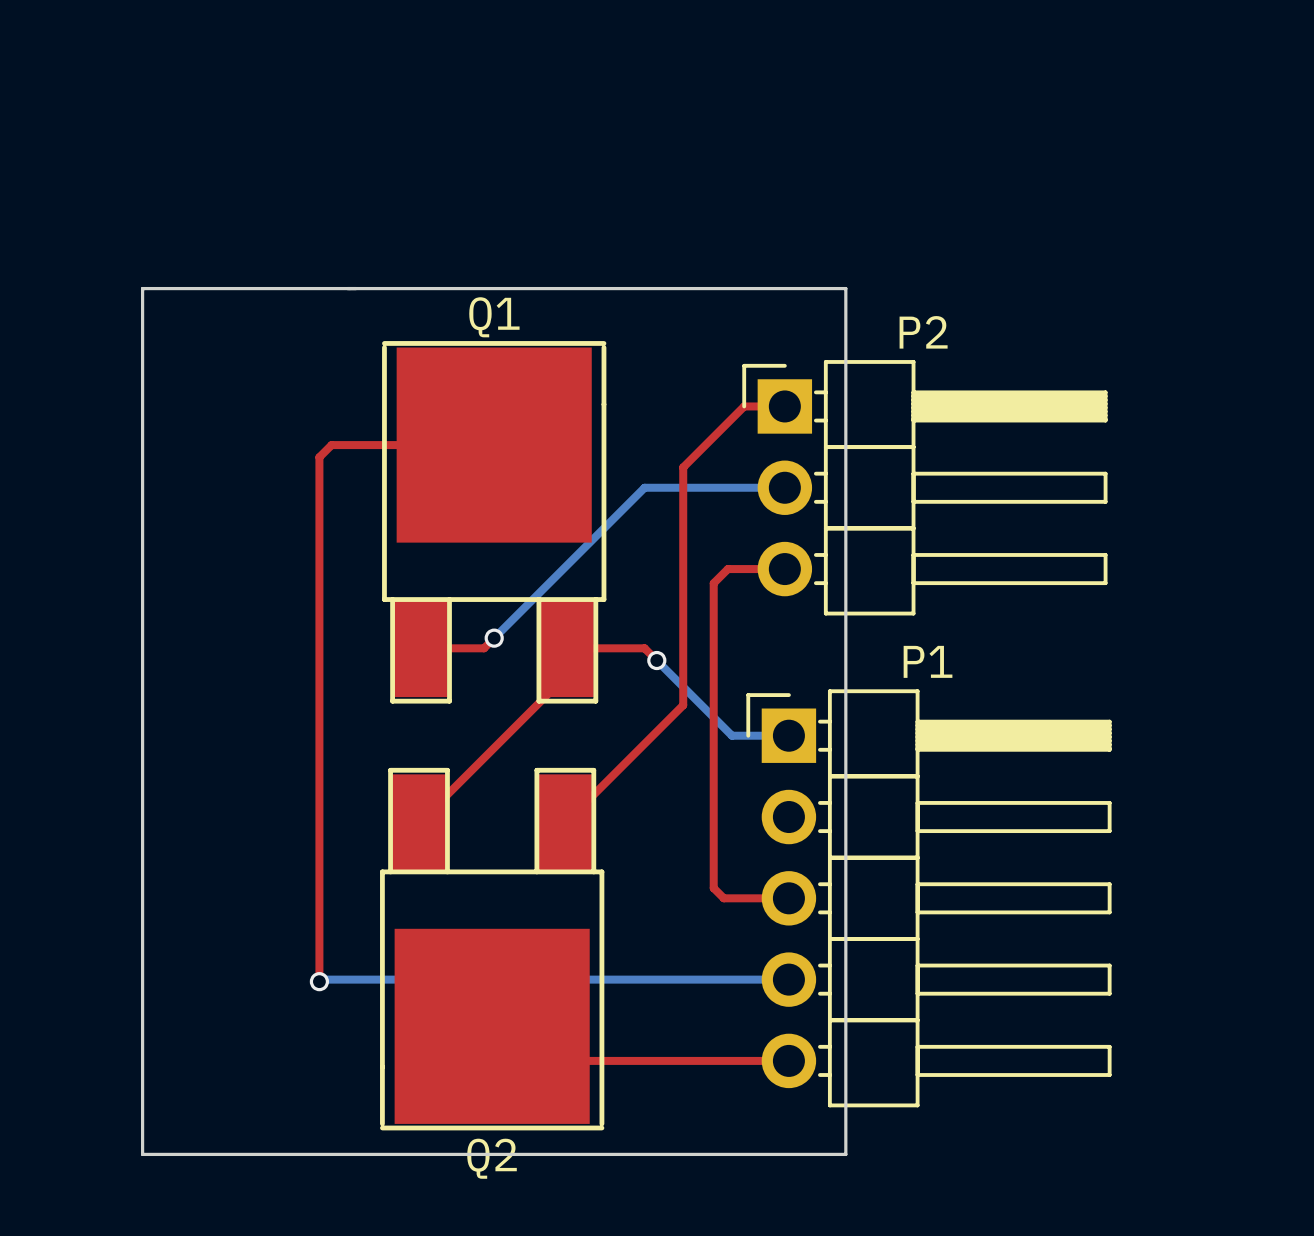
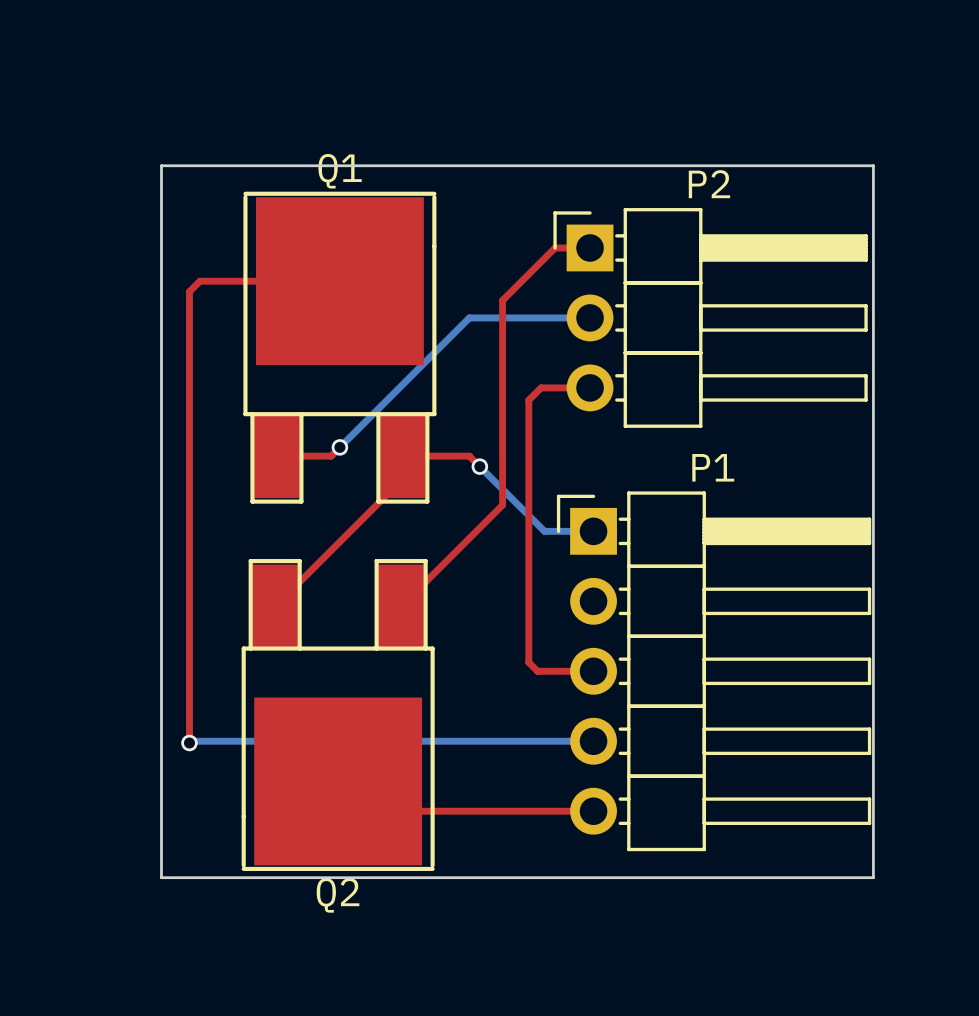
board edge: (142, 288) (845, 288) (845, 1154) (142, 1154) (142, 288) -> (161, 165) (161, 877) (873, 877) (873, 165) (161, 165)

